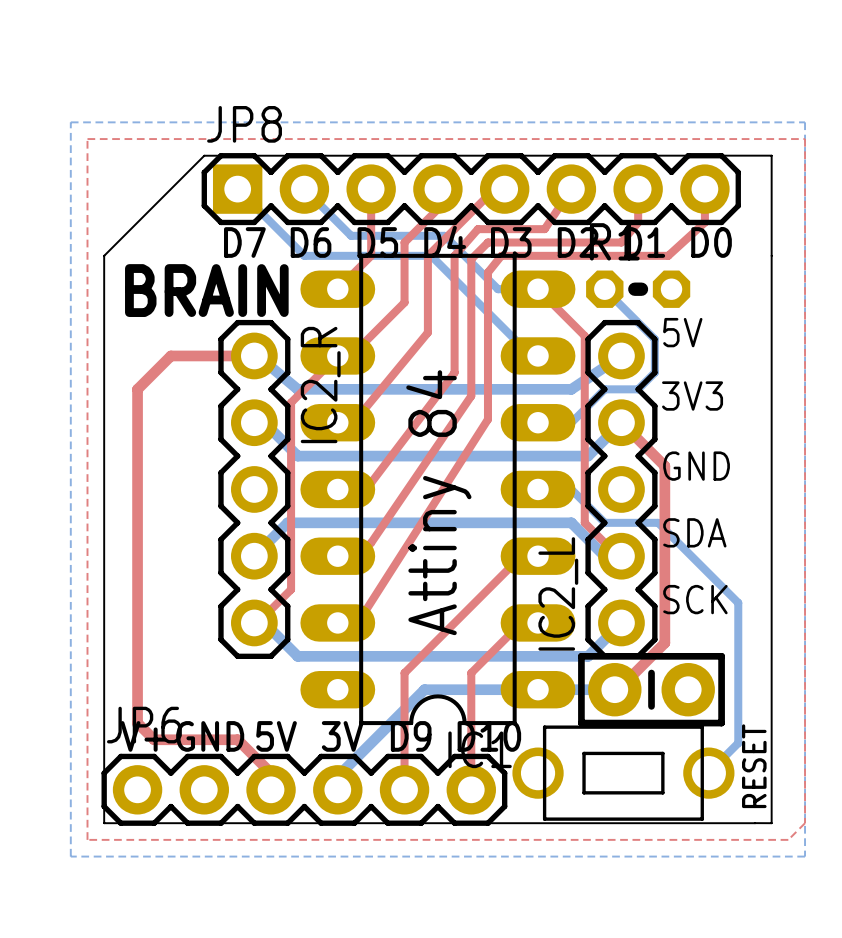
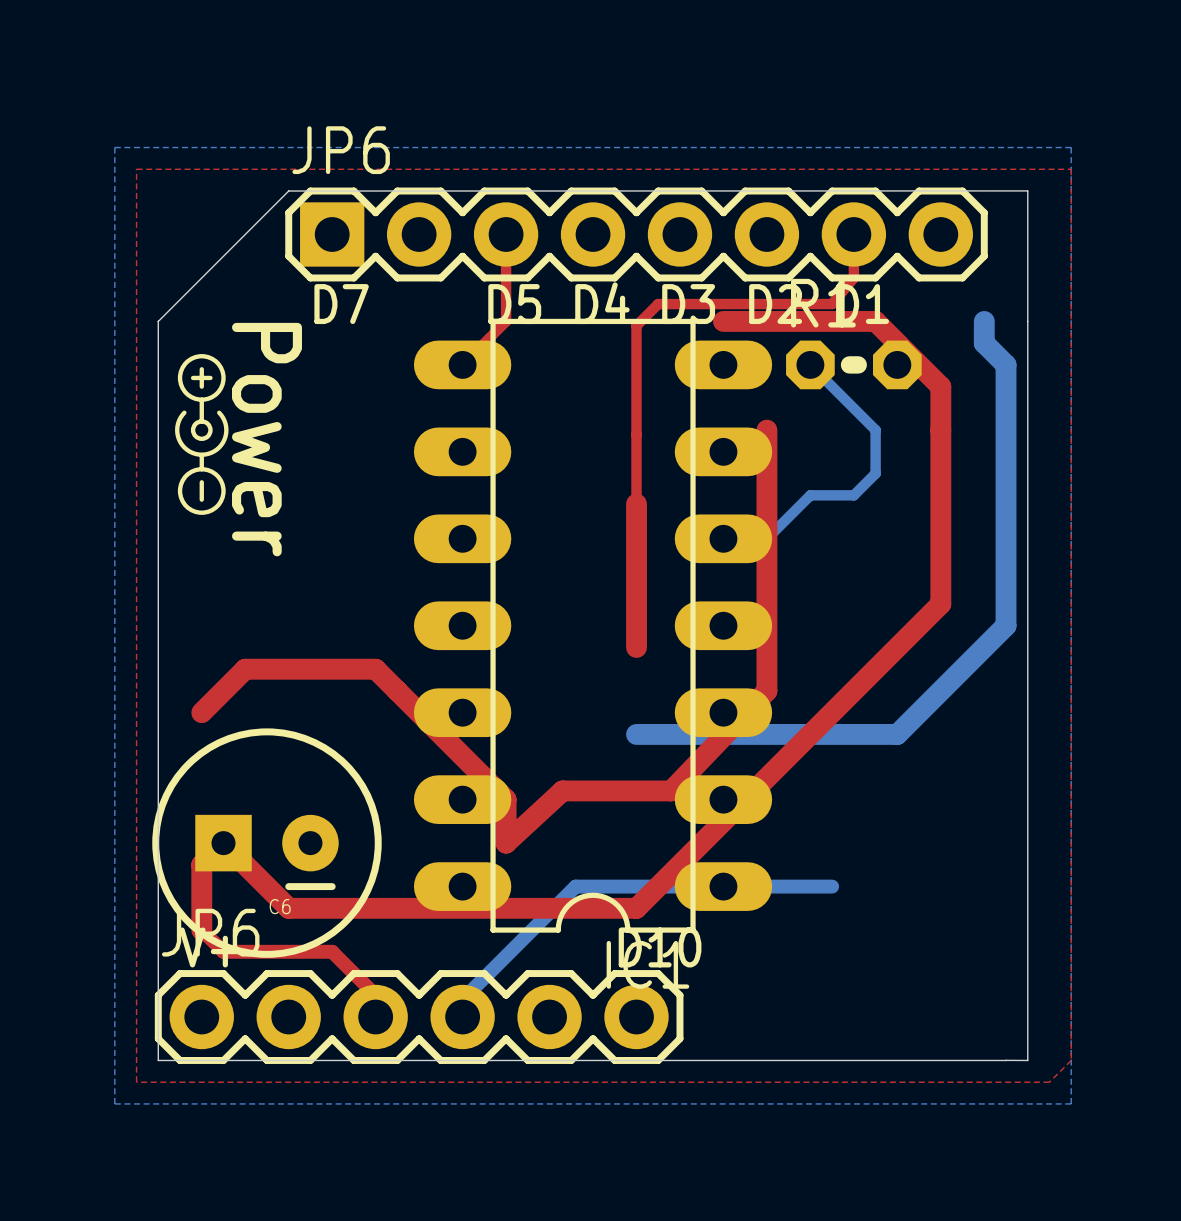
JP8 name: JP8 (244, 124) -> JP6 (341, 150)
bottom track: (237, 189) (304, 255) (431, 255) (531, 355) (538, 355) -> none
bottom track: (304, 189) (351, 235) (444, 235) (497, 289) (538, 289) -> none
top track: (437, 189) (437, 209) (404, 242) (404, 302) (351, 355) (337, 355) (291, 402) (291, 589) (257, 622) (254, 622) -> none
top track: (504, 189) (494, 189) (427, 255) (427, 332) (364, 409) (351, 422) (337, 422) -> none
top track: (571, 189) (544, 229) (477, 229) (454, 255) (454, 372) (364, 489) (337, 489) -> none
top track: (704, 189) (704, 222) (668, 255) (654, 255) -> none
text: D6 (311, 242) -> none
text: D0 (711, 242) -> none
top track: (538, 255) (501, 255) (487, 272) (487, 419) (357, 622) (337, 622) -> none
top track width: thin (538, 255) (654, 255) -> thick (723, 321) (875, 321)
bottom track: none -> (984, 321) (984, 343) (1006, 364) (1006, 625) (897, 734) (636, 734)
drawing: none -> [175, 354, 229, 515]
top track: (538, 289) (584, 335) (584, 522) (618, 556) (621, 556) -> none
text: BRAIN (206, 290) -> none
text: 5V (682, 332) -> none
top track: none -> (766, 430) (766, 690) (671, 790) (562, 790) (506, 843) (506, 799) (375, 669) (245, 669) (201, 712)
text: none -> Power (266, 439)
bottom track: (254, 355) (257, 355) (297, 389) (571, 389) (621, 355) -> none
top track: (254, 355) (170, 355) (137, 389) (137, 673) -> (875, 321) (940, 386) (940, 604) (636, 908) (288, 908) (223, 843) (201, 864)
top track: (471, 396) (371, 542) (357, 556) (337, 556) -> (636, 504) (636, 647)
text: 3V3 (692, 396) -> none
bottom track: (254, 422) (264, 422) (297, 456) (588, 456) (621, 422) -> none
top track: (621, 422) (664, 466) (664, 642) (618, 689) (614, 689) -> none
text: GND (696, 466) -> none
IC2_R: (254, 489) -> none
bottom track: (538, 489) (571, 489) (604, 522) (658, 522) (738, 602) (738, 743) (708, 773) -> none
IC2_L: (621, 489) -> none
text: Attiny 84 (438, 502) -> none
text: SDA (694, 532) -> none
bottom track: (254, 556) (287, 522) (571, 522) (604, 556) (621, 556) -> none
top track: (538, 556) (521, 556) (404, 673) (404, 789) -> none
text: SCK (695, 599) -> none
bottom track: (254, 622) (264, 622) (297, 656) (588, 656) (621, 622) -> none
top track: (538, 622) (521, 622) (471, 673) (471, 789) -> none
C6: none -> (266, 843)
top track width: thin (137, 673) (137, 723) -> thick (201, 864) (201, 930)
part: (651, 689) -> none
text: GND (210, 736) -> none
text: 5V (276, 736) -> none
text: 3V (342, 736) -> none
text: D9 (411, 736) -> none
text: RESET (754, 766) -> none
part: (623, 773) -> none

